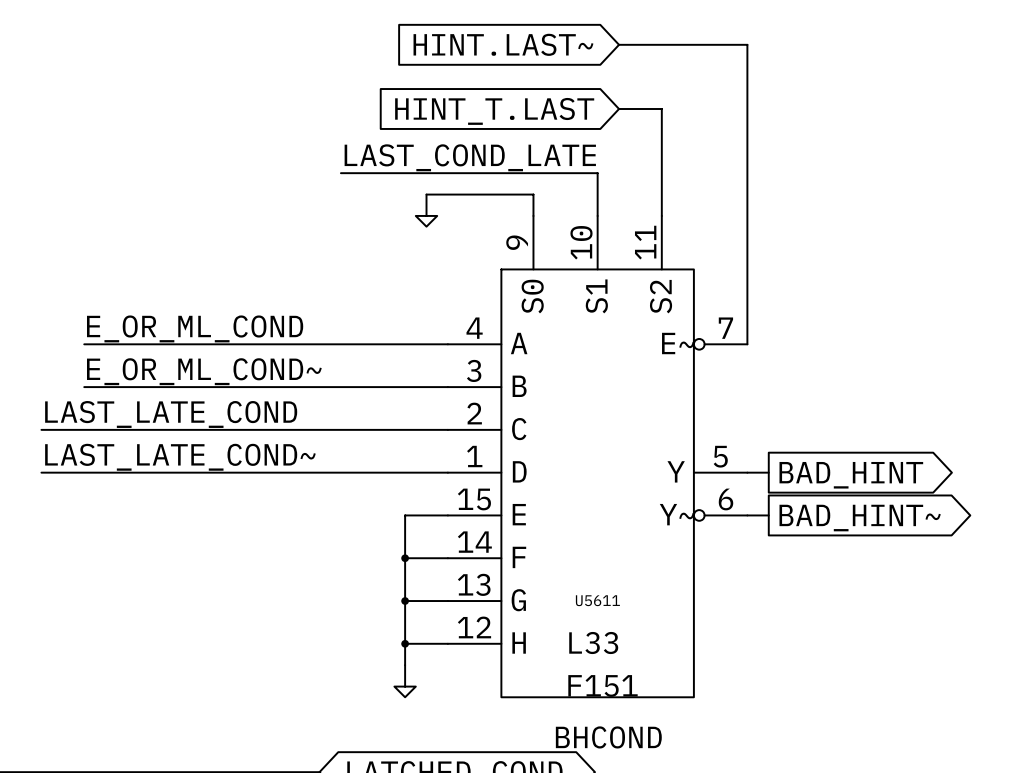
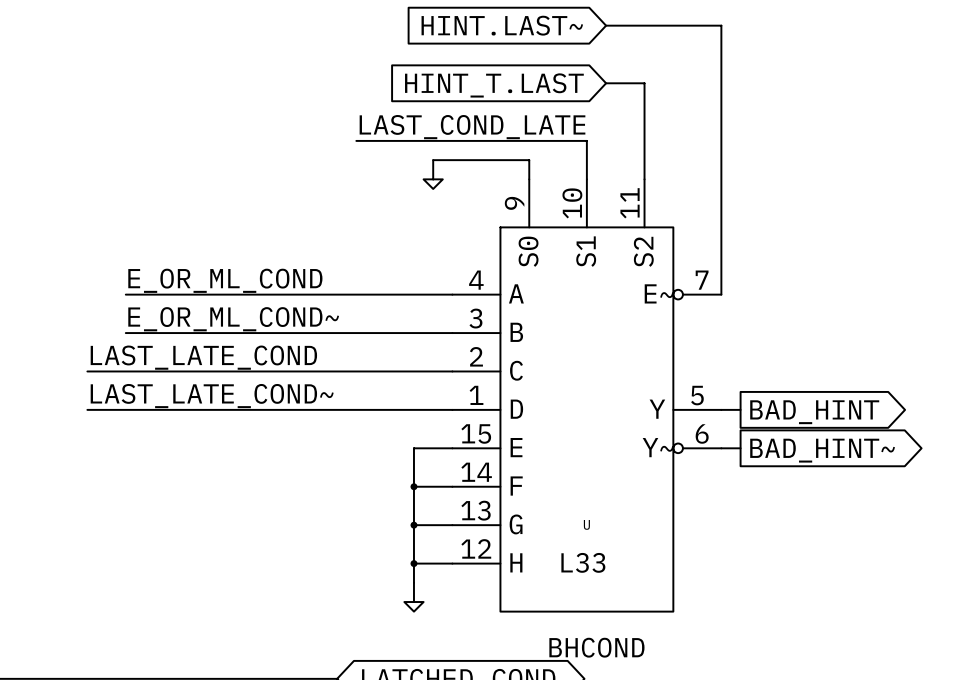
U5611 name: U5611 (597, 600) -> U (586, 524)
U5611 value: F151 (602, 685) -> none

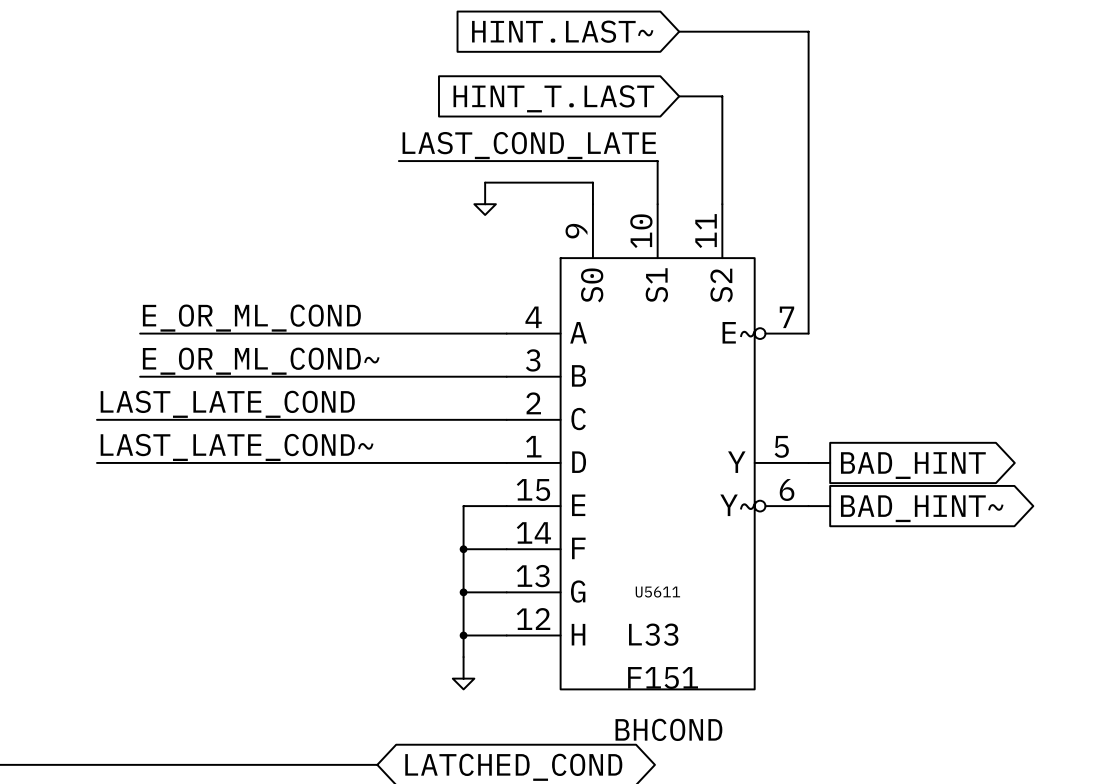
U name: U (586, 524) -> U5611 (657, 592)
U value: none -> F151 (663, 677)

